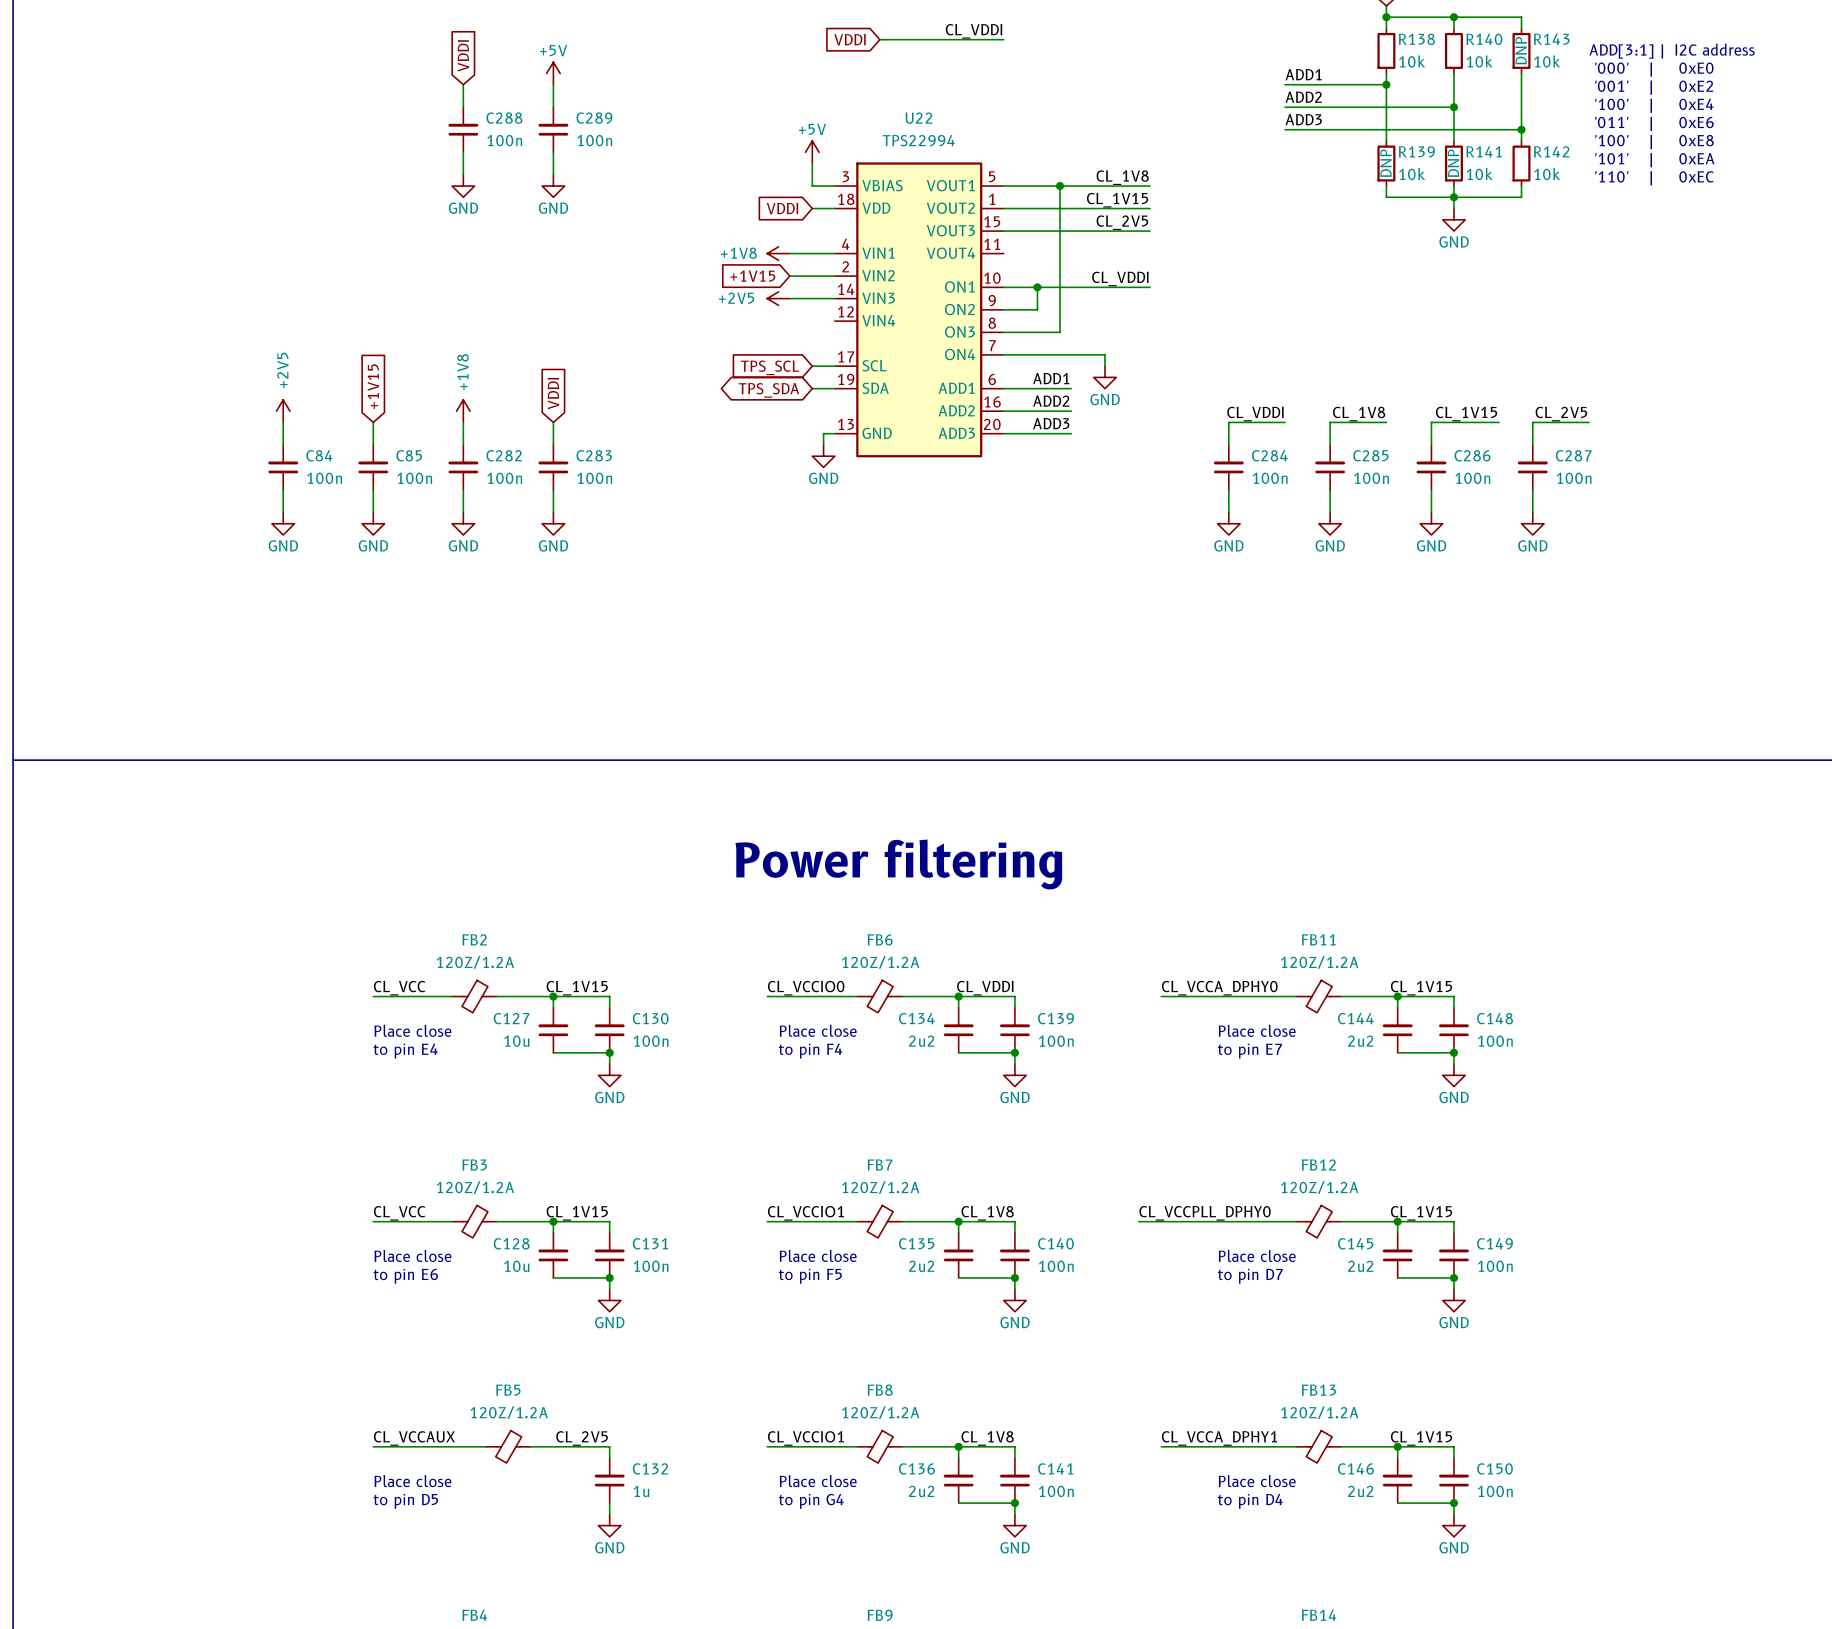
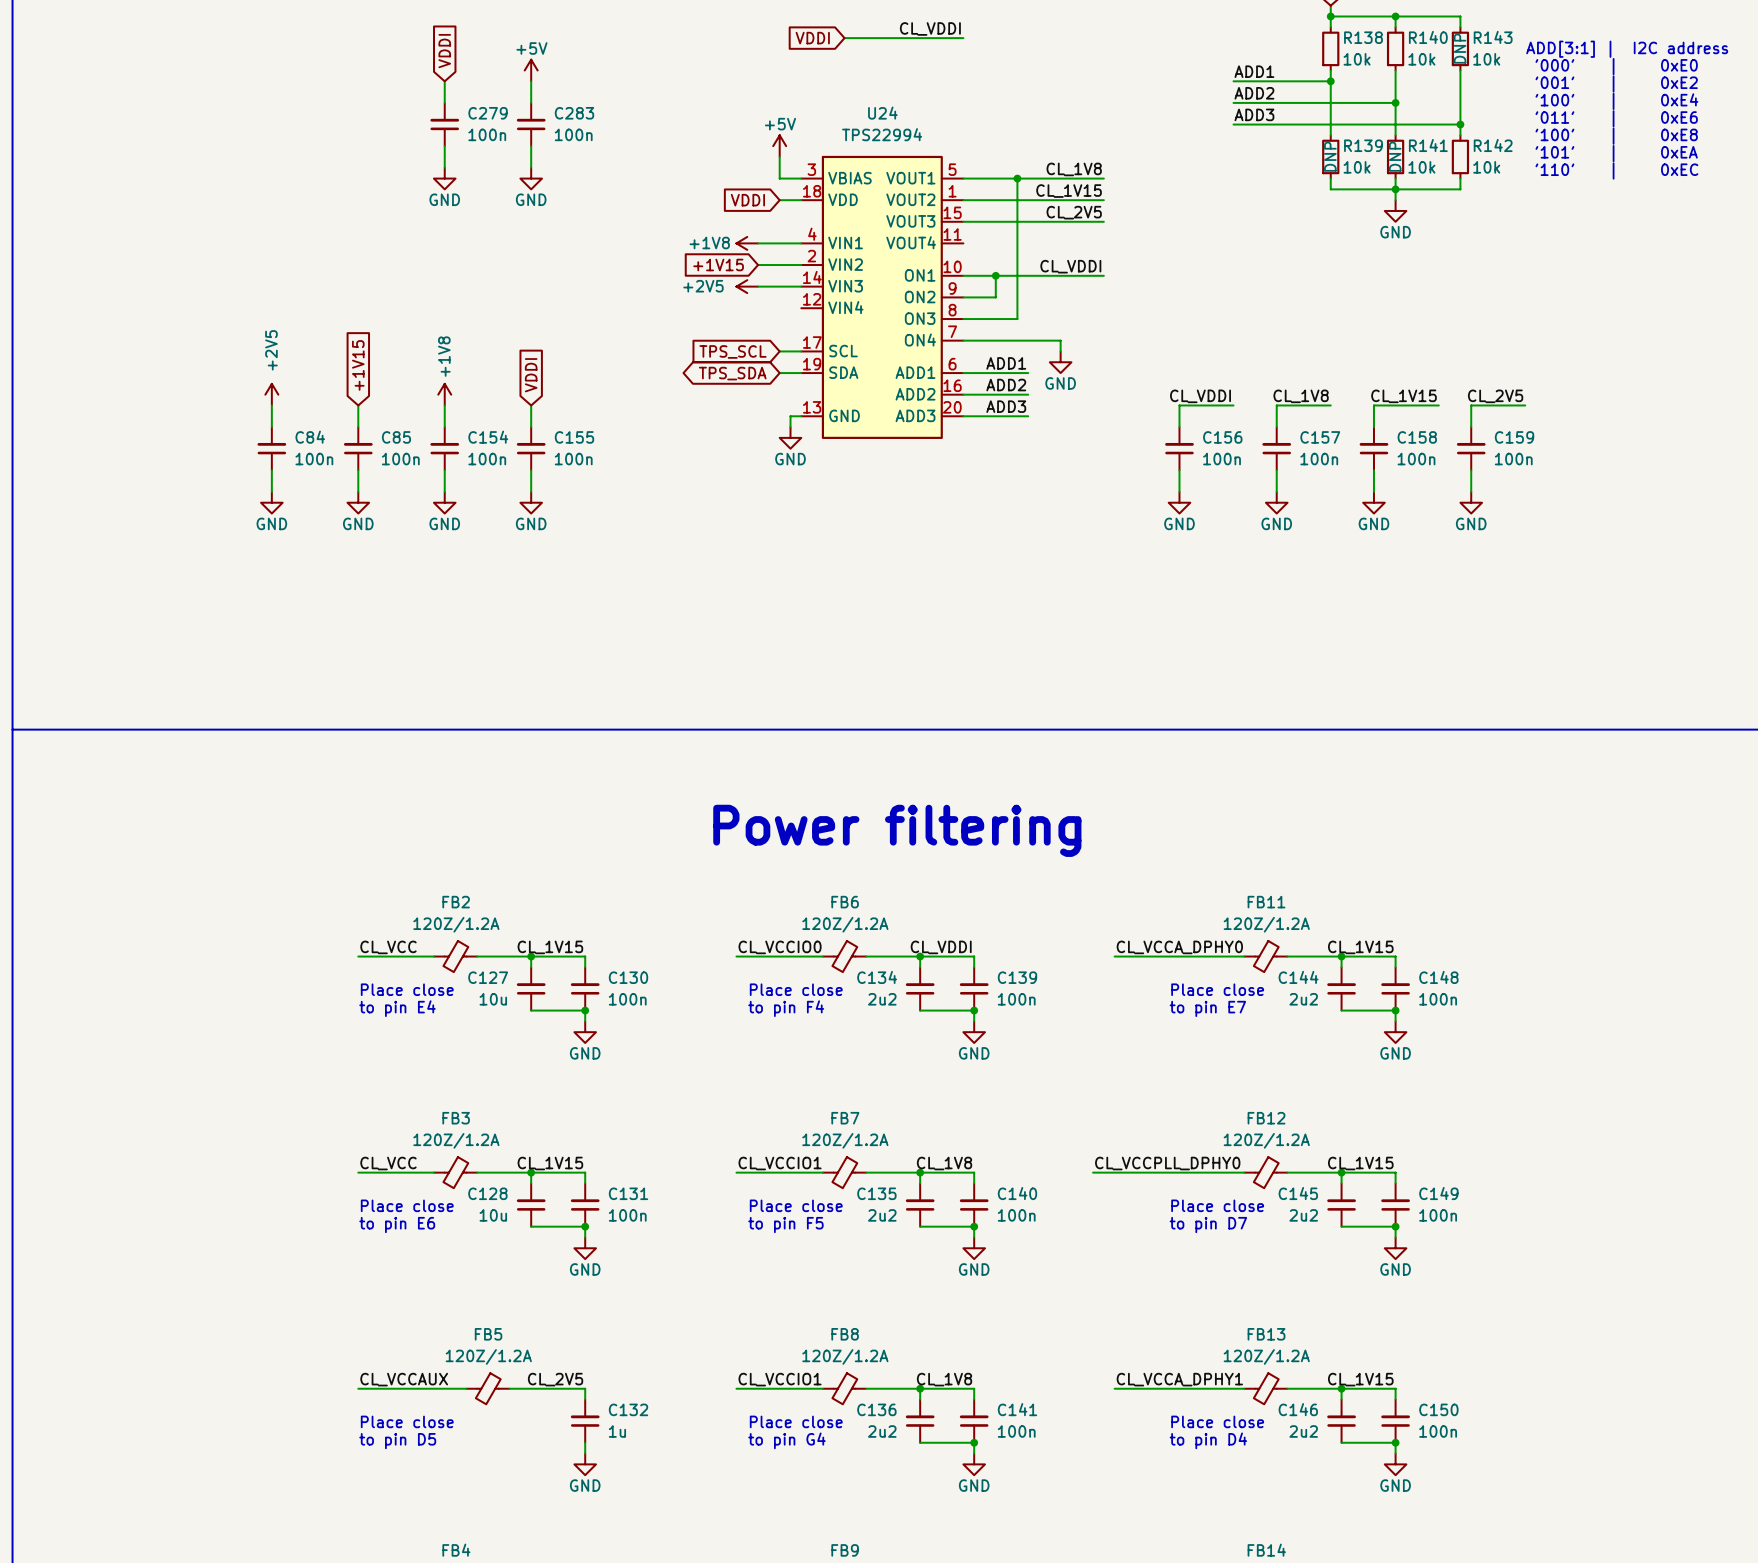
C288 name: C288 (504, 118) -> C279 (488, 113)
C289 name: C289 (594, 118) -> C283 (574, 113)
U22 name: U22 (918, 118) -> U24 (882, 113)
C282 name: C282 (504, 455) -> C154 (488, 437)
C283 name: C283 (594, 455) -> C155 (574, 437)
C284 name: C284 (1269, 455) -> C156 (1222, 437)
C285 name: C285 (1370, 455) -> C157 (1320, 437)
C286 name: C286 (1472, 455) -> C158 (1417, 437)
C287 name: C287 (1573, 455) -> C159 (1514, 437)

